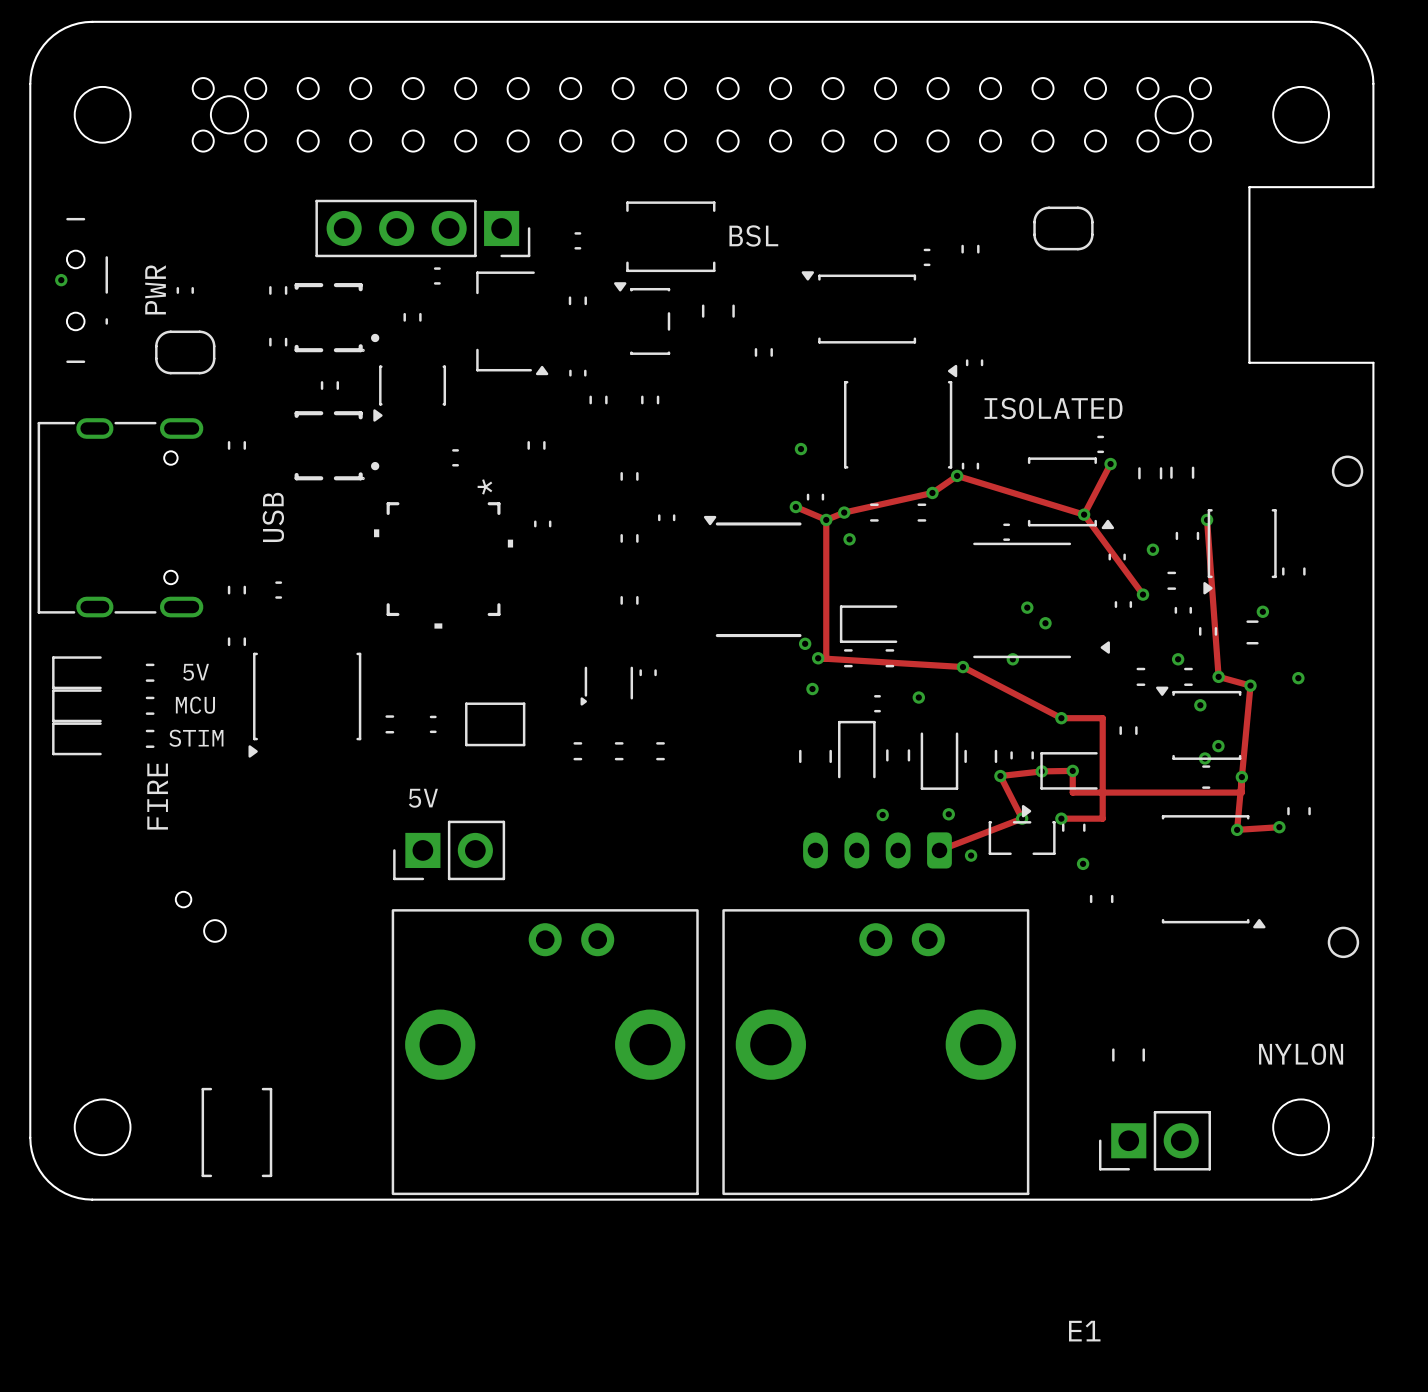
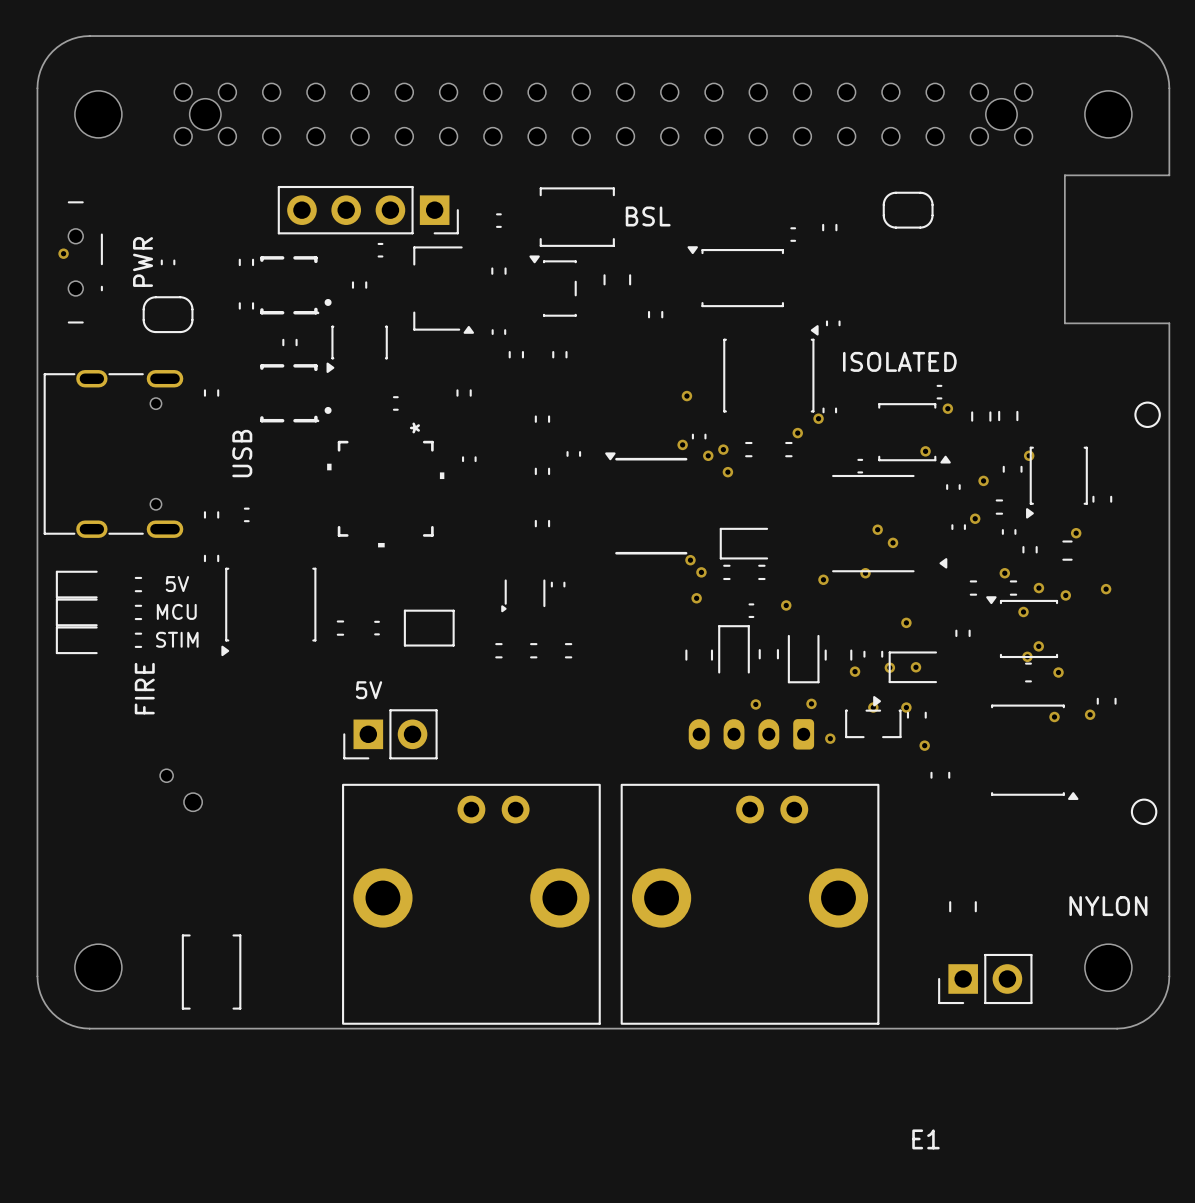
track: (1110, 464) (1084, 514) -> none
track: (795, 507) (826, 519) -> none
track: (1084, 514) (1143, 594) -> none
track: (1084, 514) (957, 475) (932, 492) (844, 512) (826, 519) -> none
track: (826, 519) (826, 658) (818, 658) (962, 667) (1061, 718) (1102, 718) (1102, 818) (1061, 818) -> none
track: (1207, 519) (1218, 676) (1250, 685) (1241, 777) -> none
track: (1241, 777) (1237, 829) (1279, 827) -> none
track: (1241, 777) (1241, 792) (1072, 792) (1072, 770) (1041, 771) (1000, 776) (1022, 818) (939, 850) -> none

